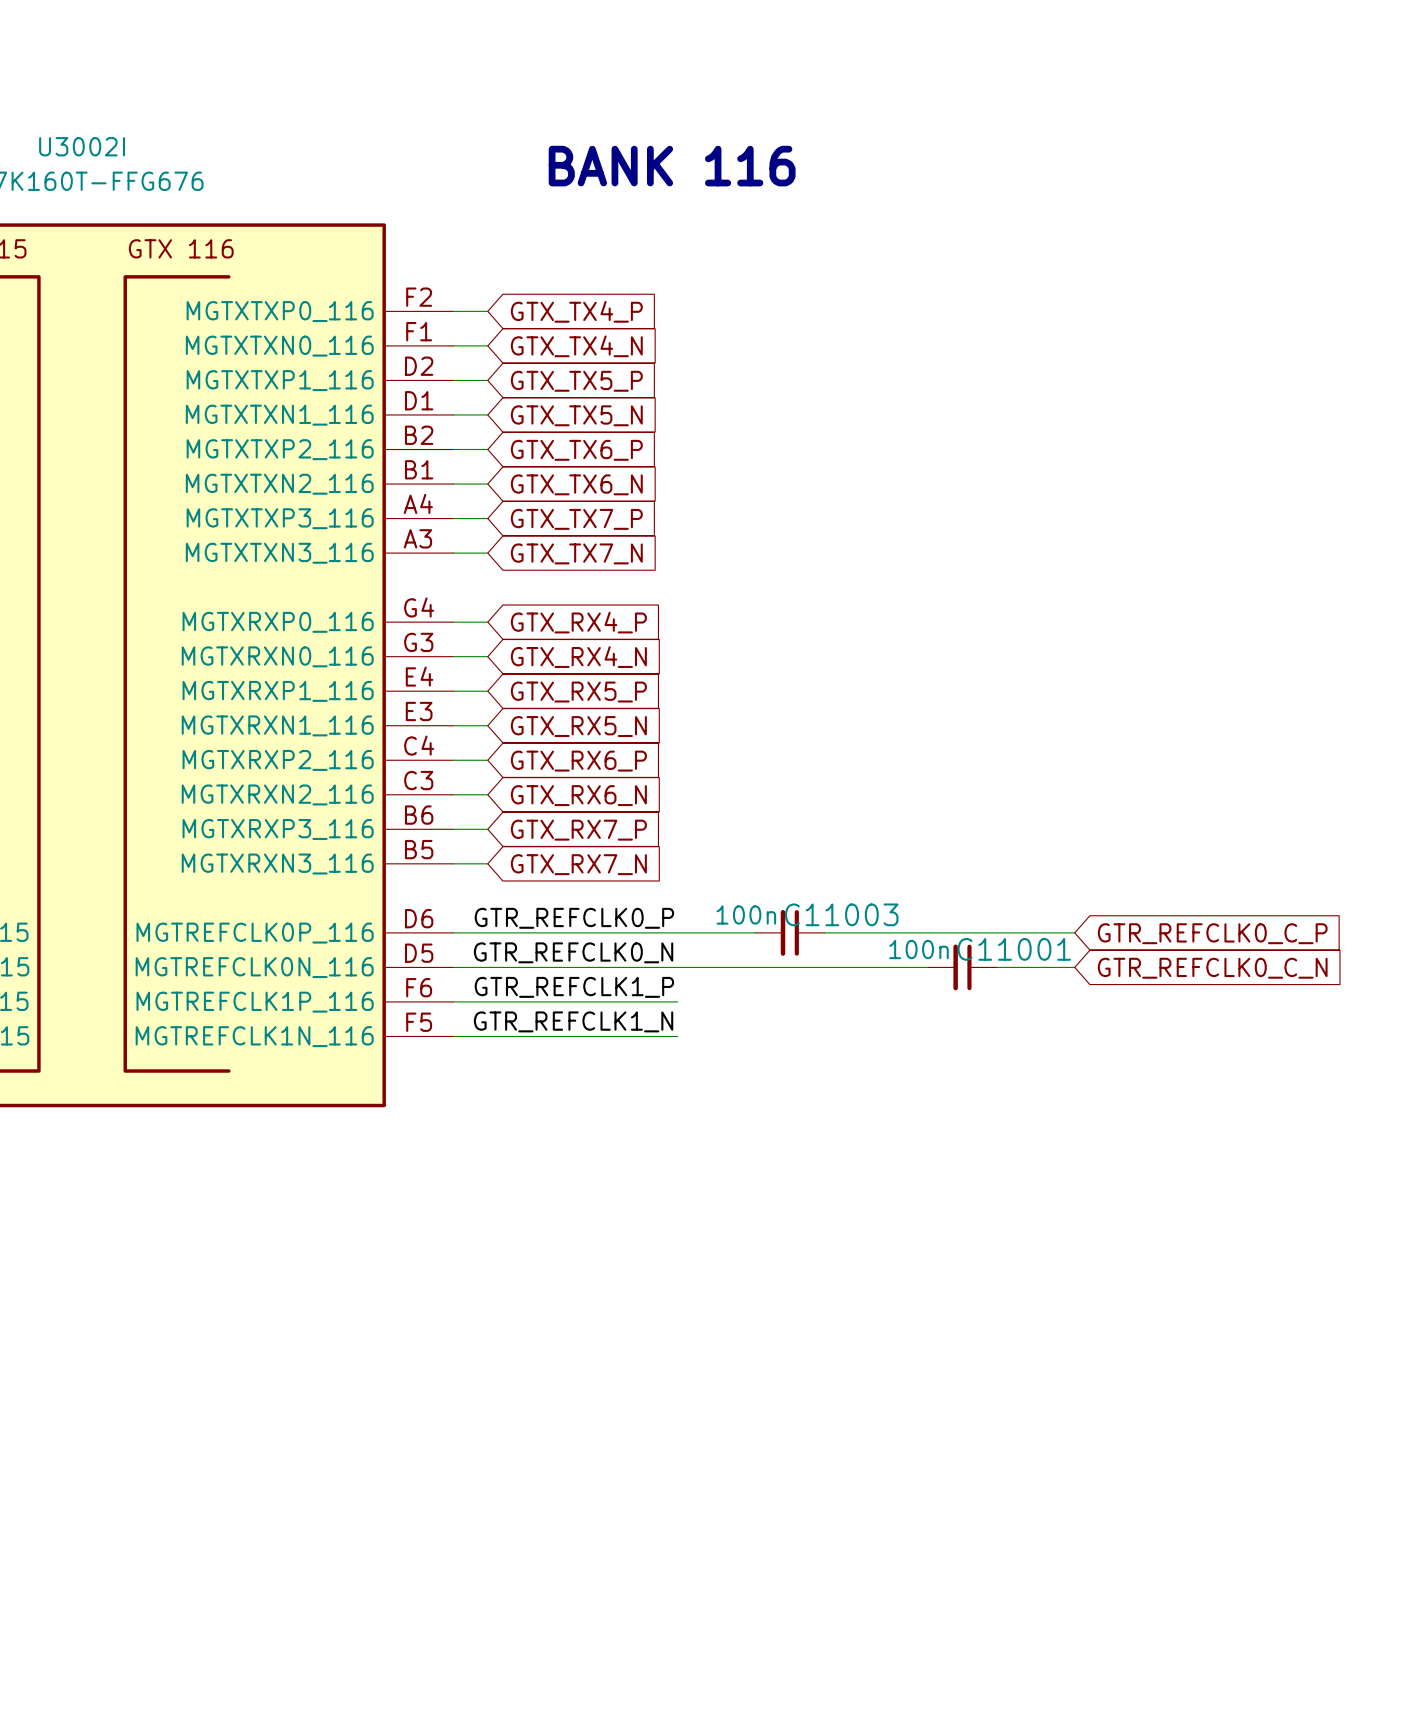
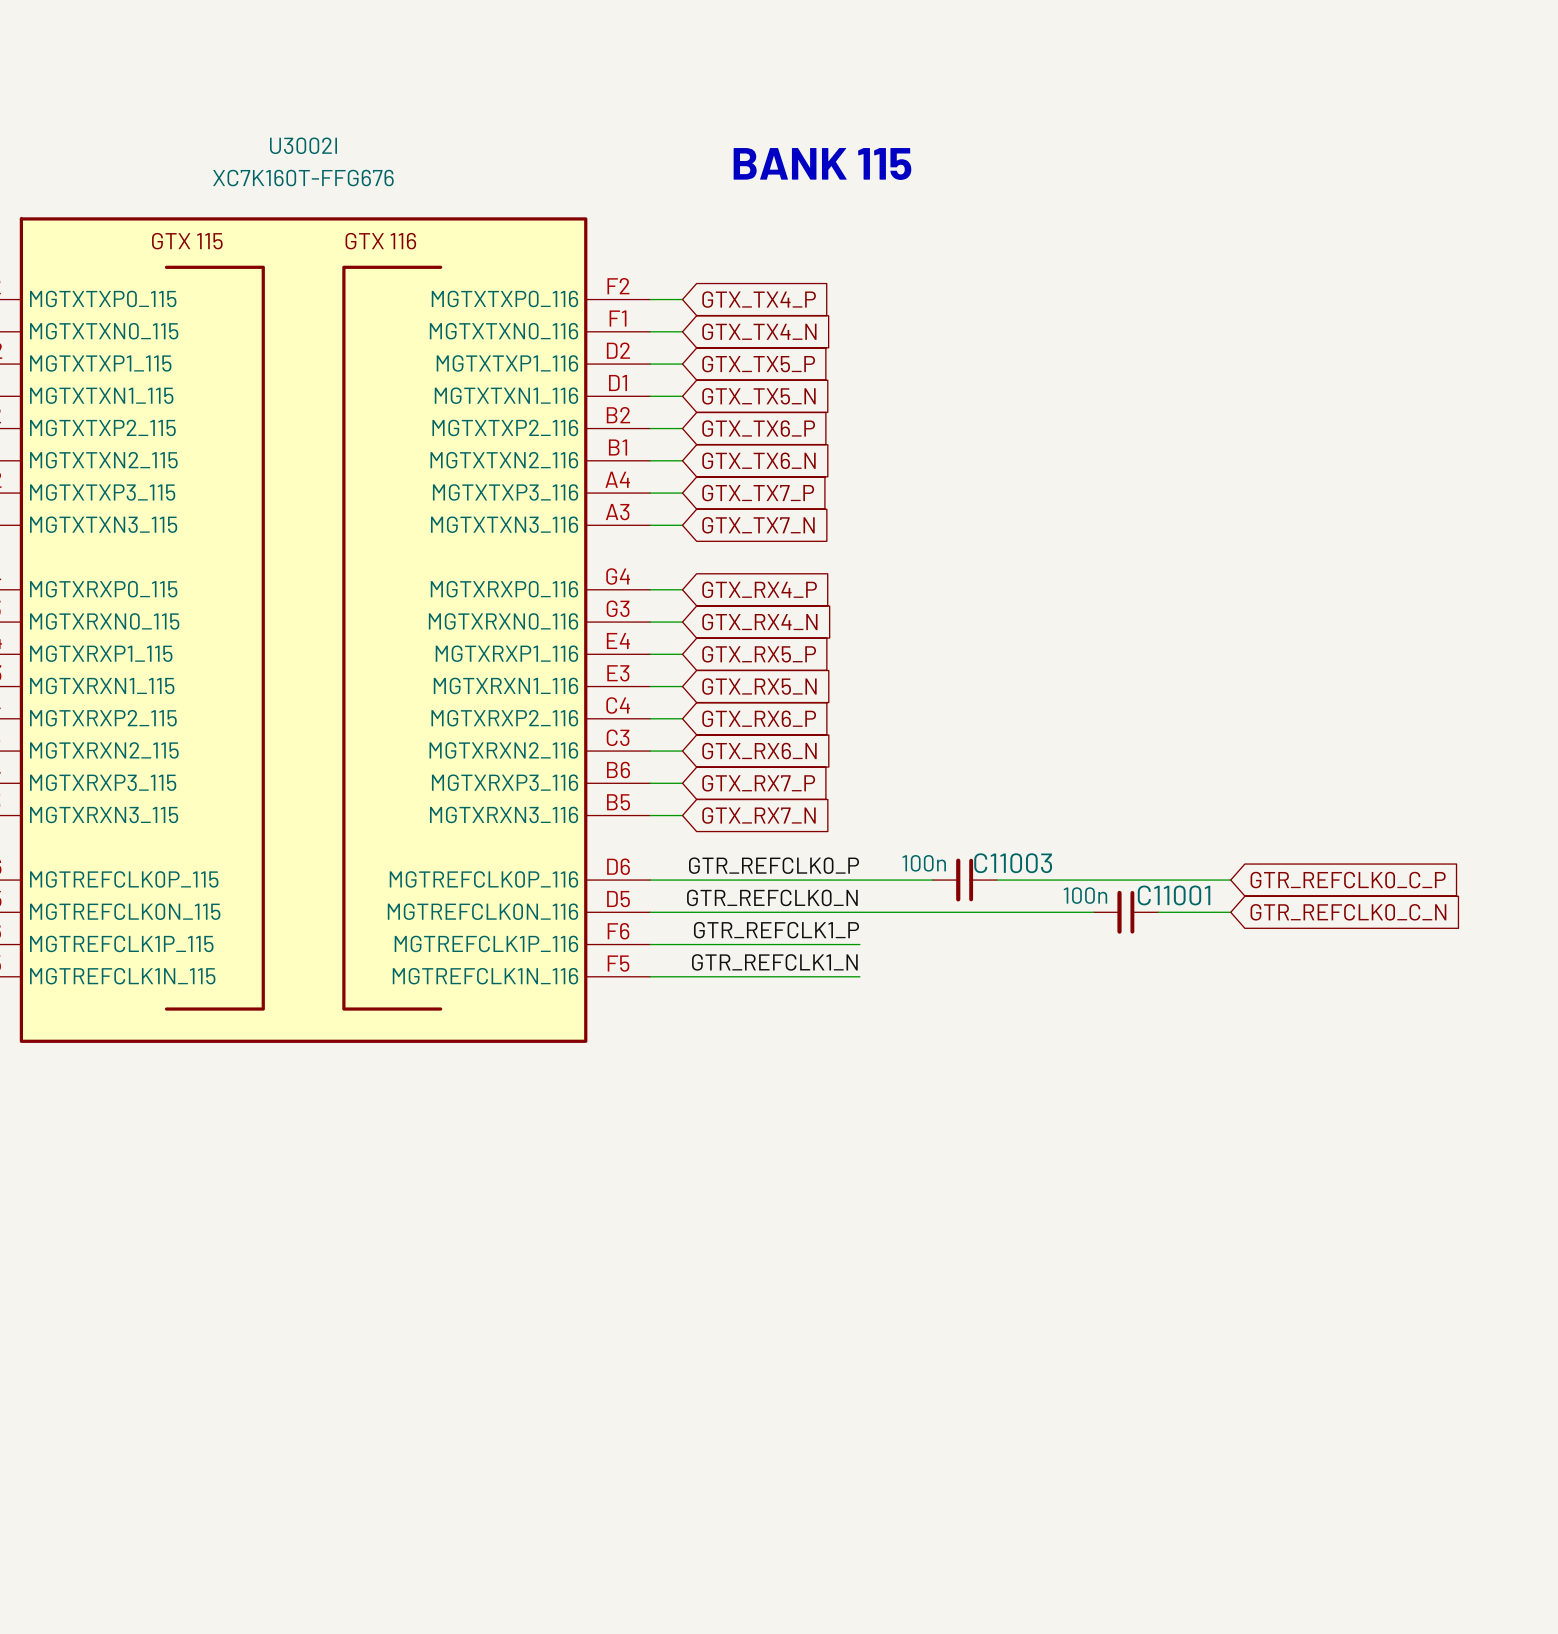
text: BANK 116 (672, 166) -> BANK 115 (822, 164)

